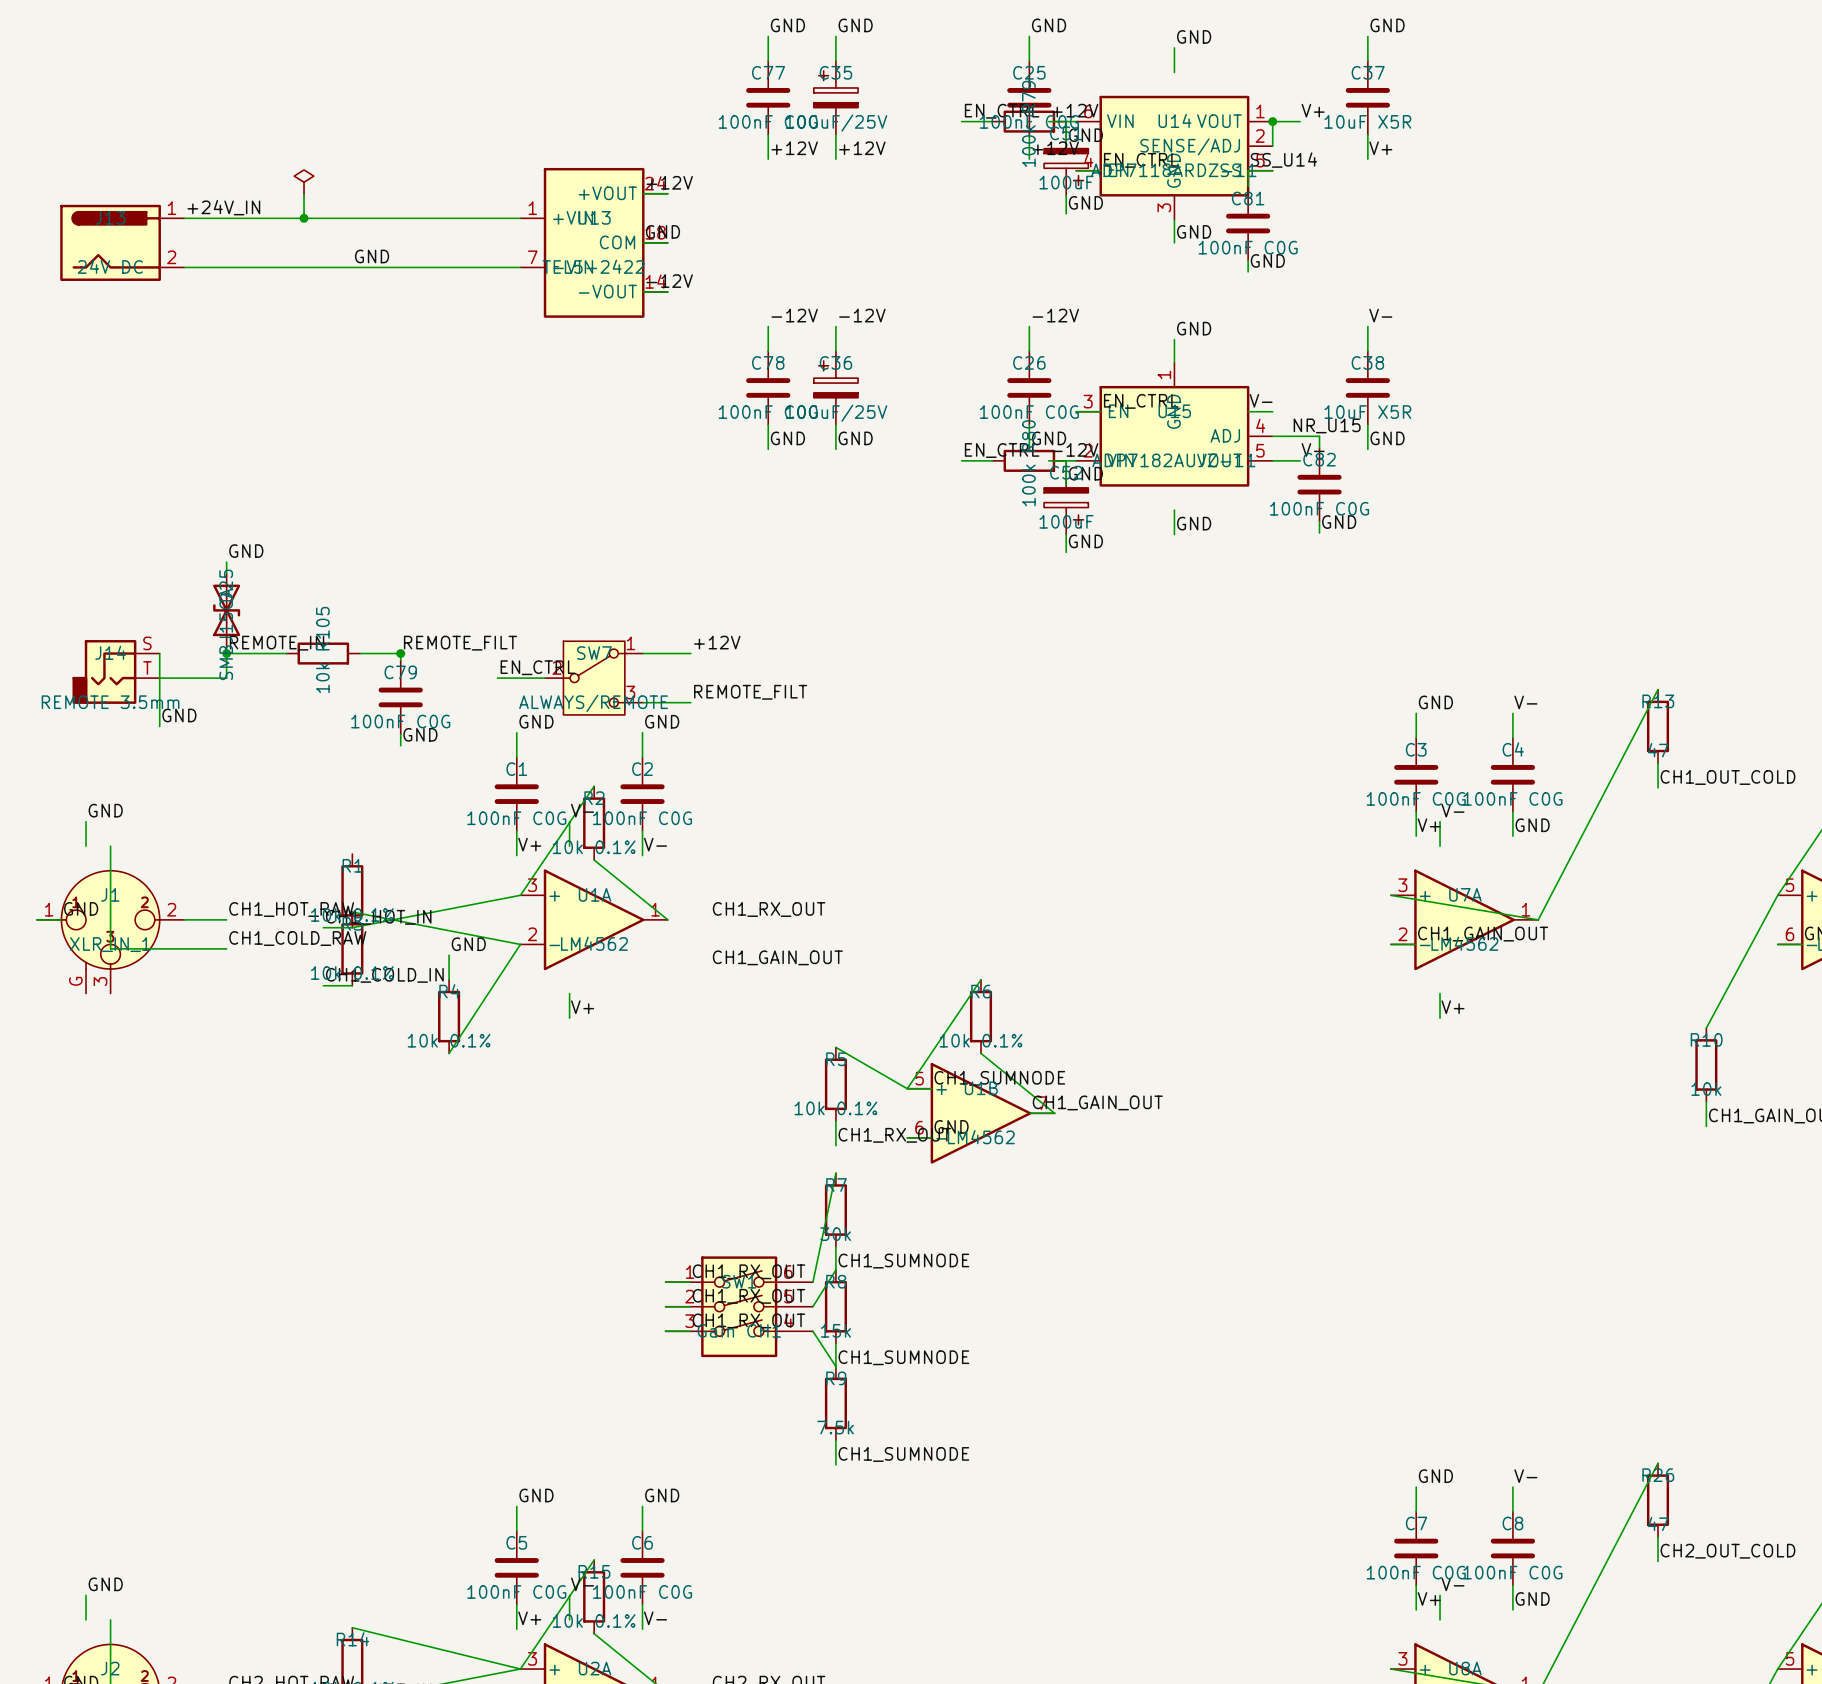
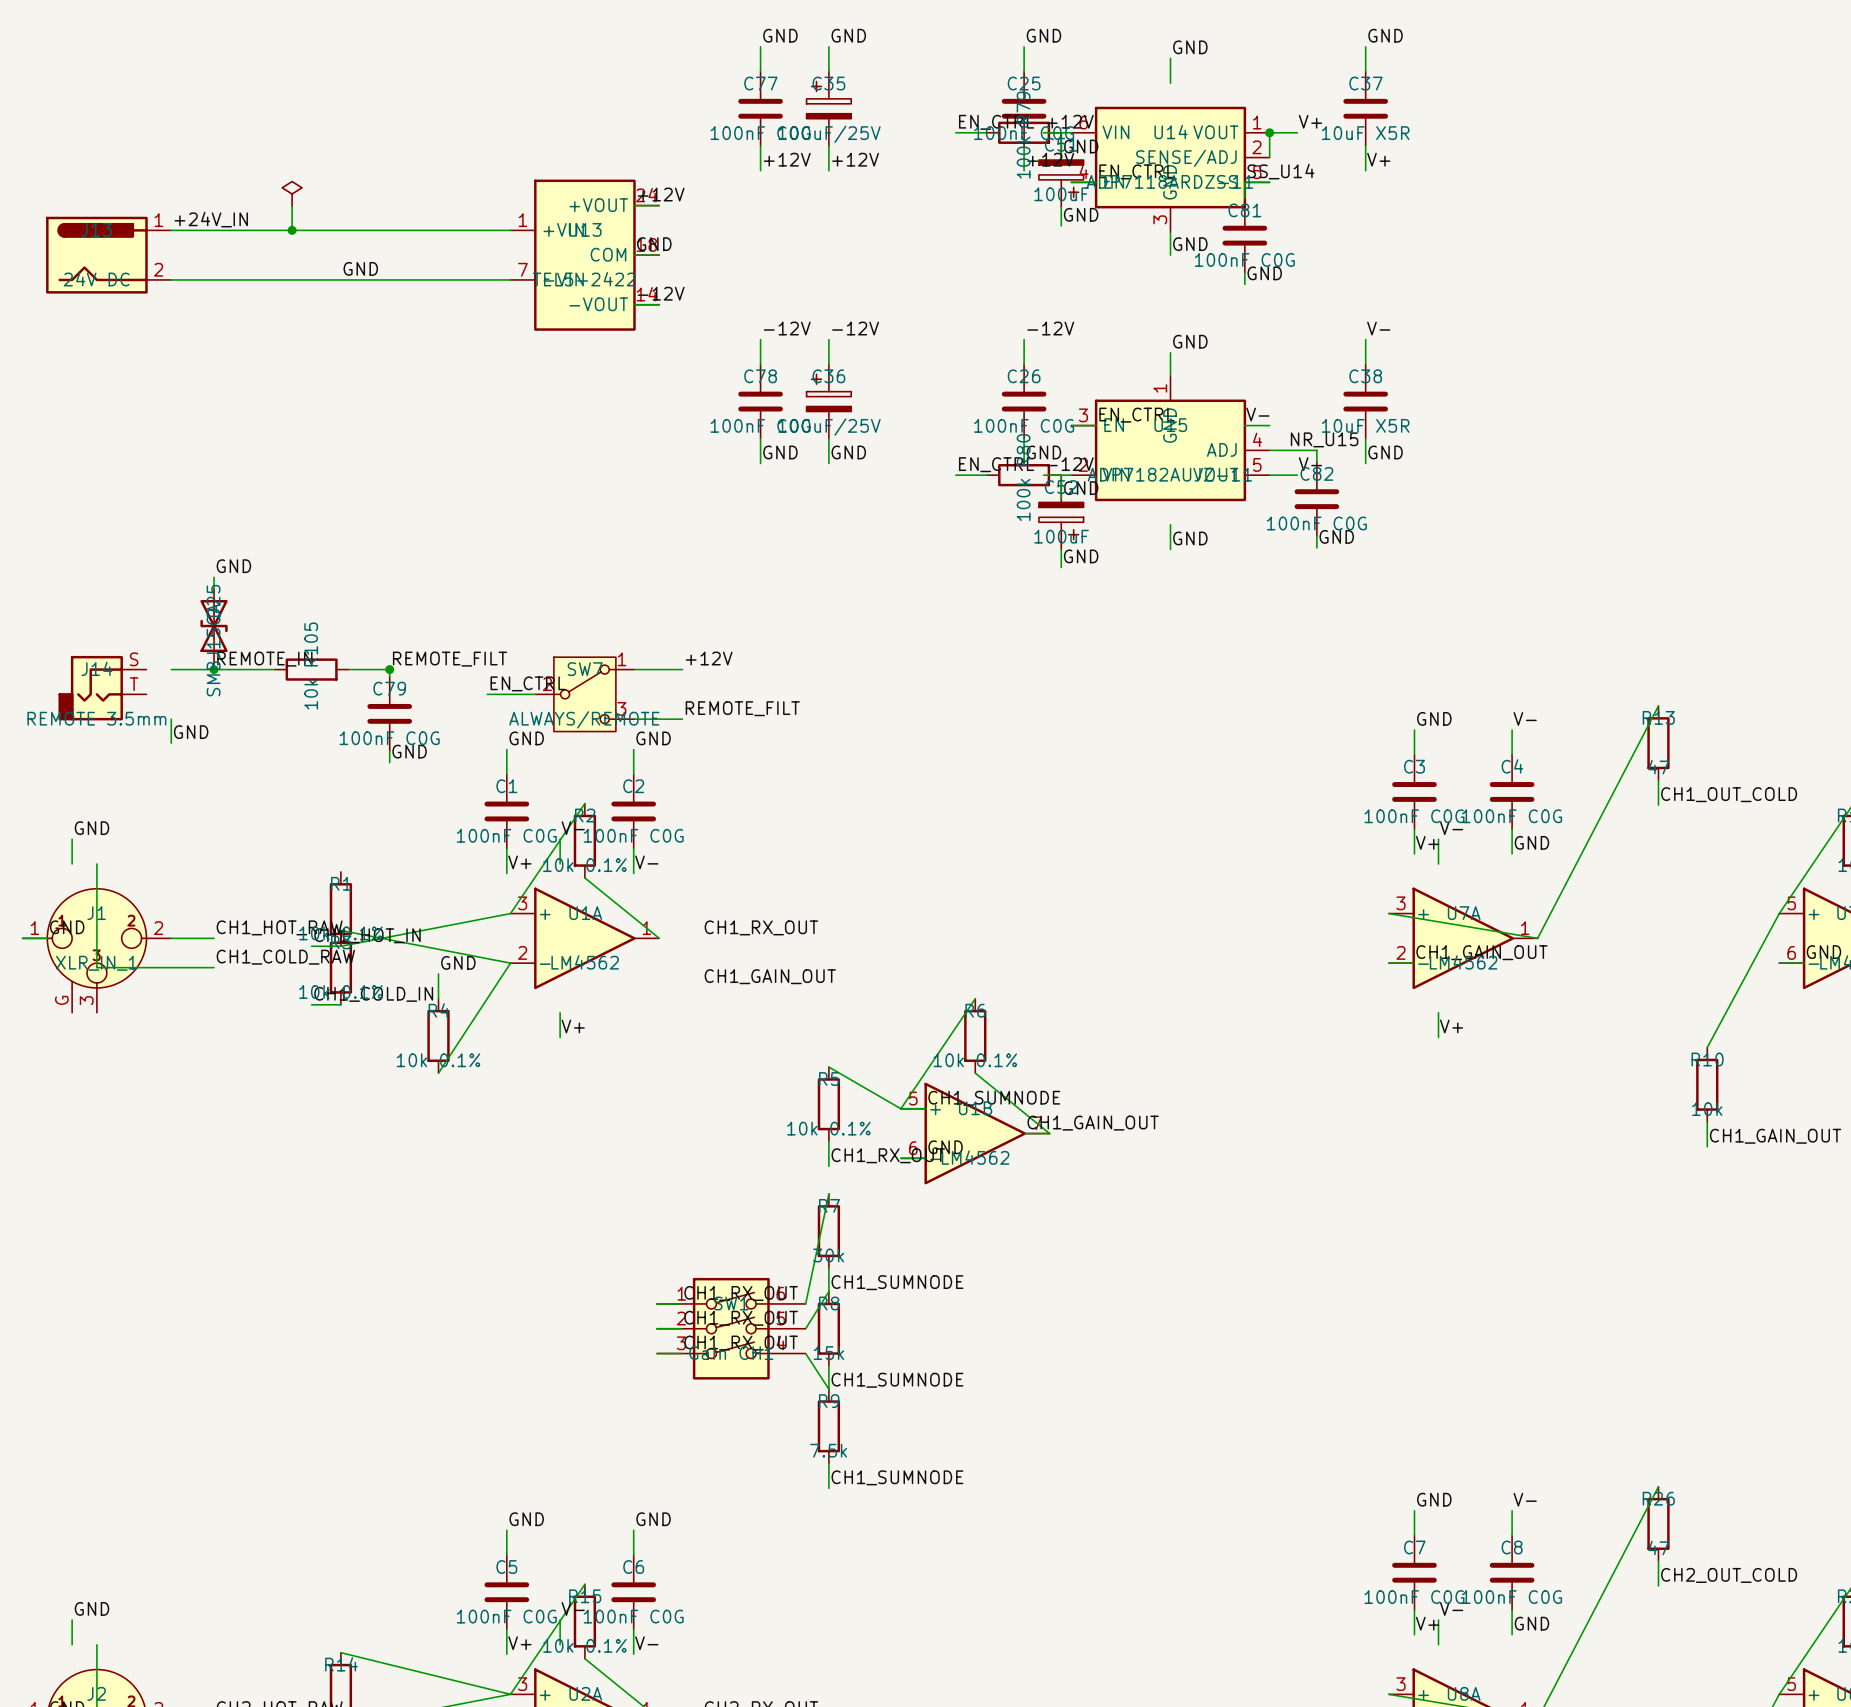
wire: (159, 653) (159, 726) -> none
wire: (226, 653) (226, 678) (159, 678) -> (214, 669) (171, 669)
wire: none -> (171, 719) (171, 743)
label position: GND (179, 715) -> GND (191, 732)

